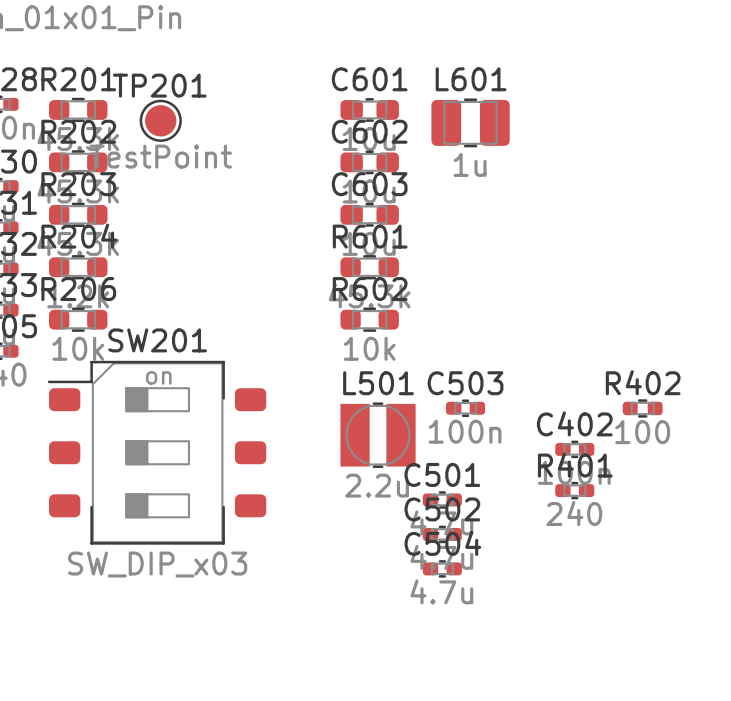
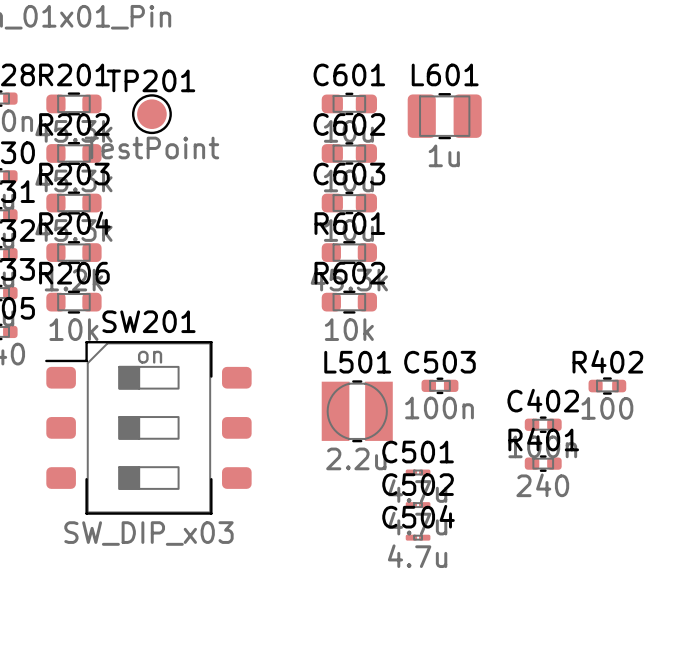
C501 footprint: [422, 491, 462, 509] -> [405, 469, 431, 476]
C502 footprint: [422, 525, 462, 544] -> [405, 502, 431, 509]
C504 footprint: [422, 560, 462, 578] -> [405, 534, 431, 541]

